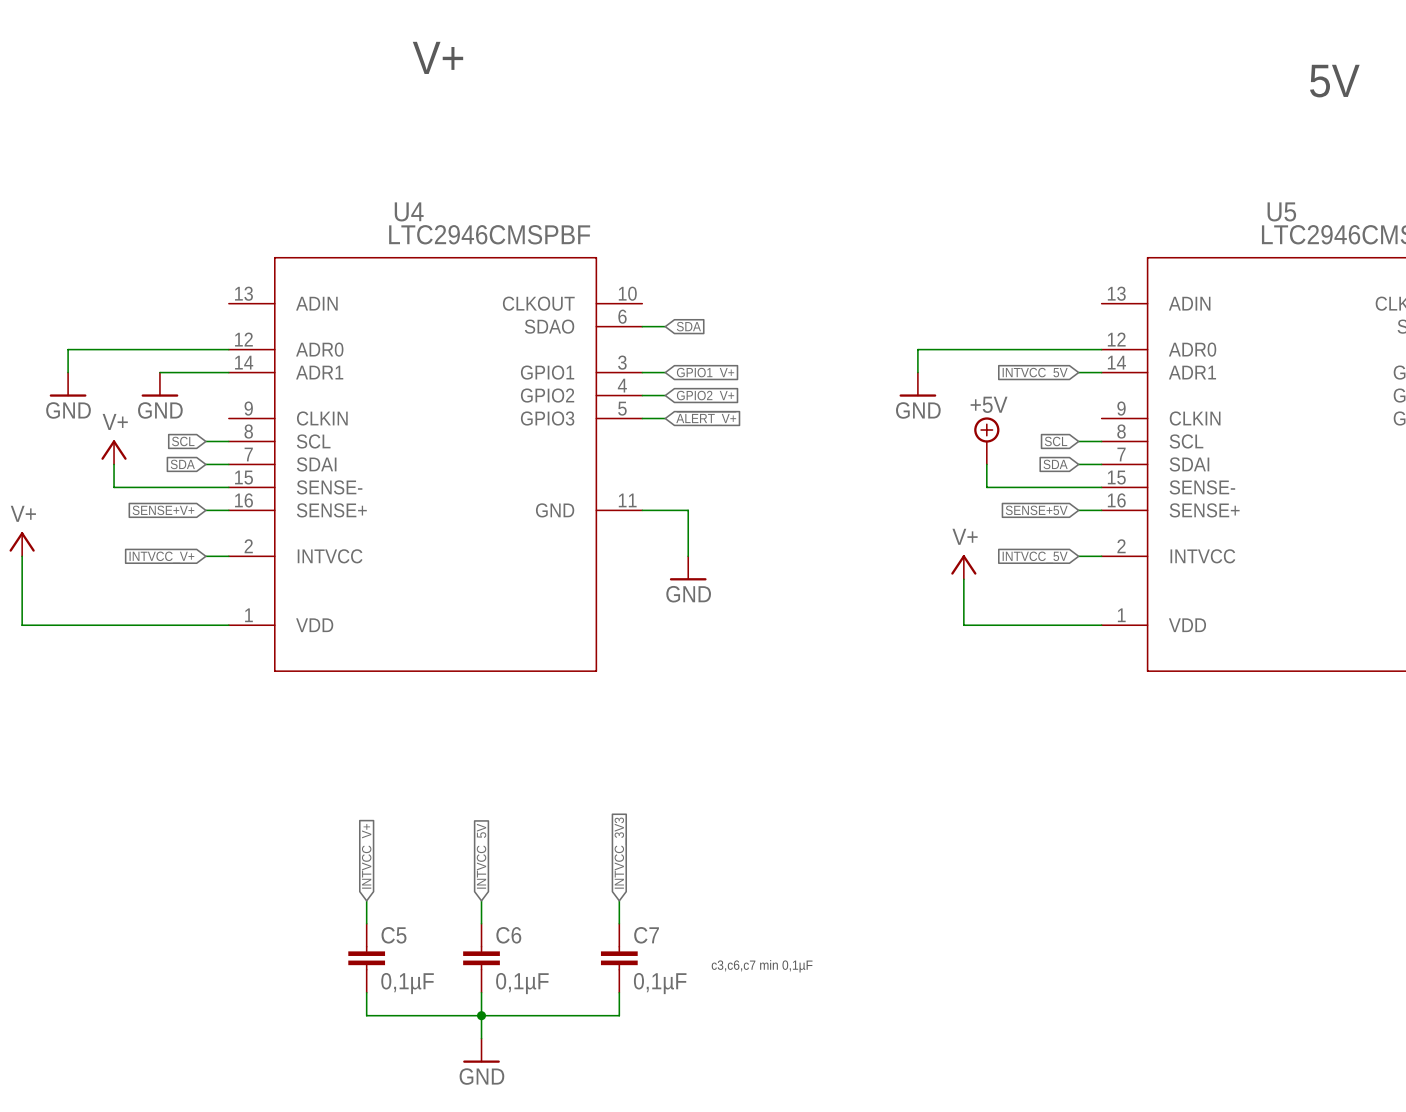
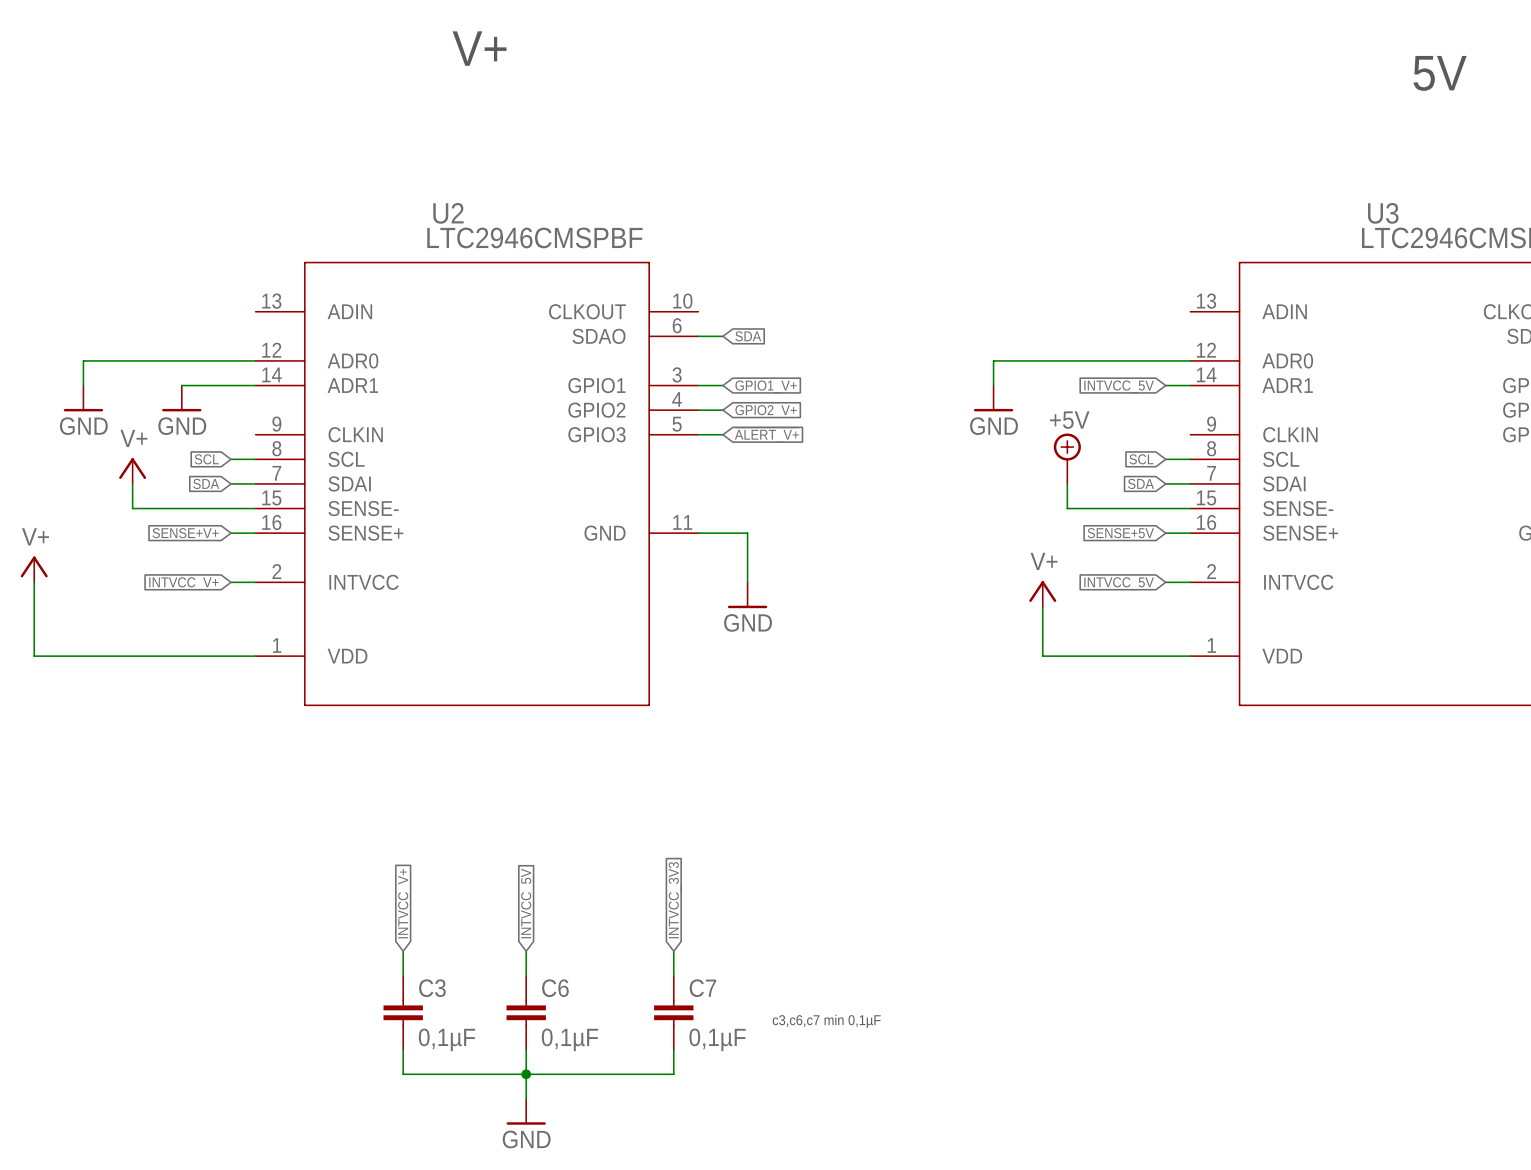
U4 name: U4 (409, 211) -> U2 (448, 213)
U5 name: U5 (1281, 211) -> U3 (1383, 213)
C5 name: C5 (393, 935) -> C3 (432, 988)

